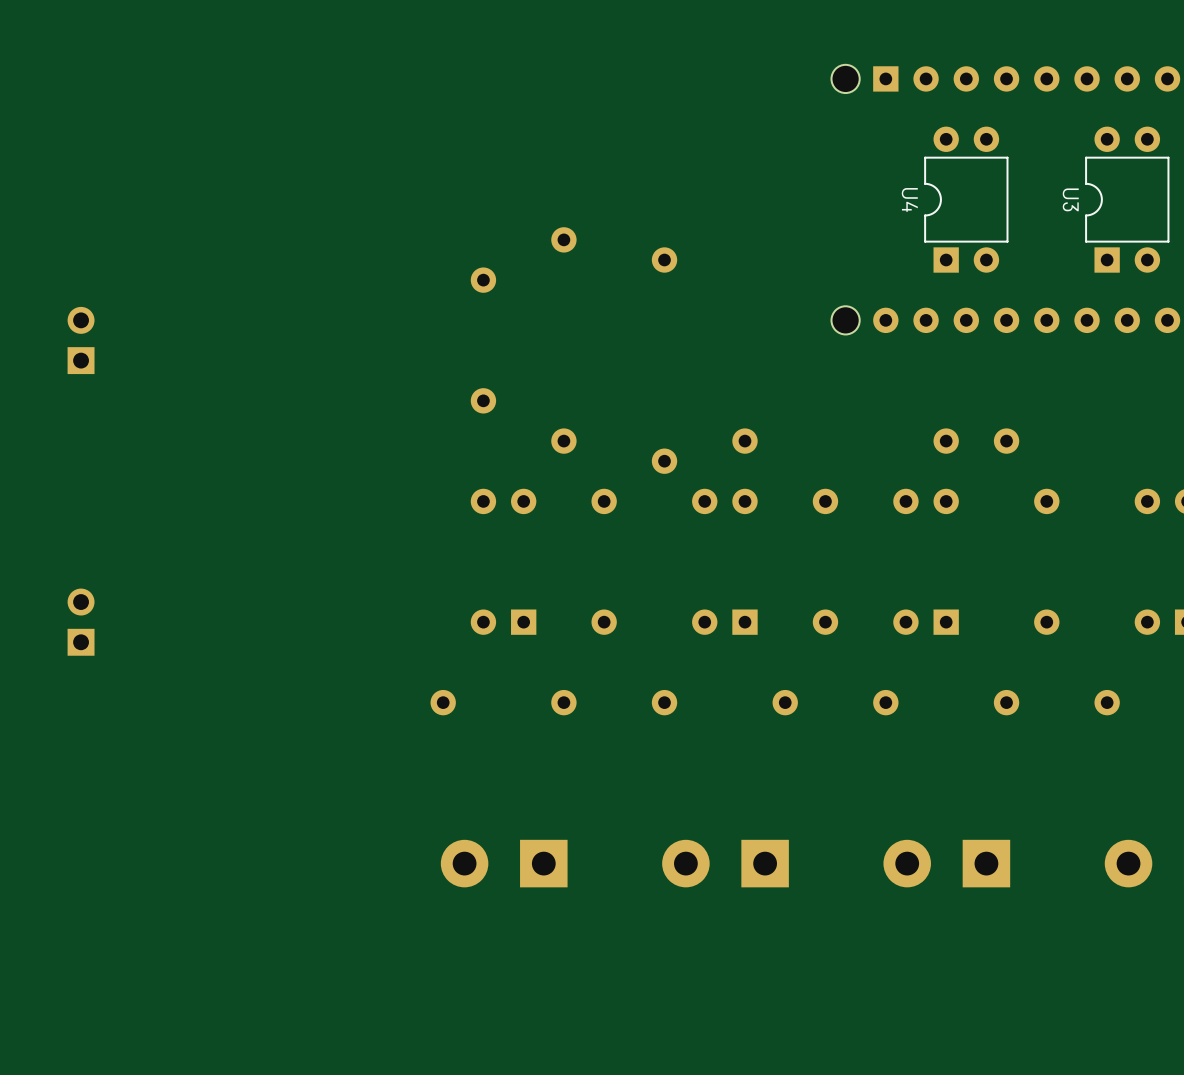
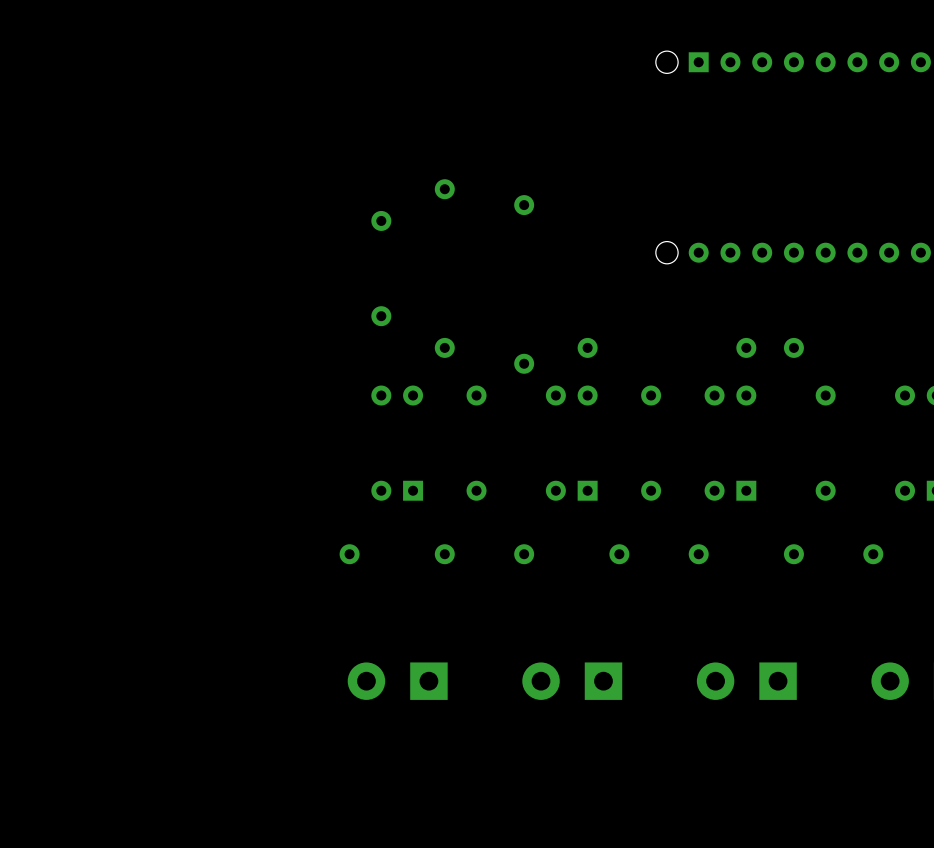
U4: (966, 199) -> none
U3: (1127, 199) -> none
part: (81, 340) -> none
part: (81, 622) -> none

